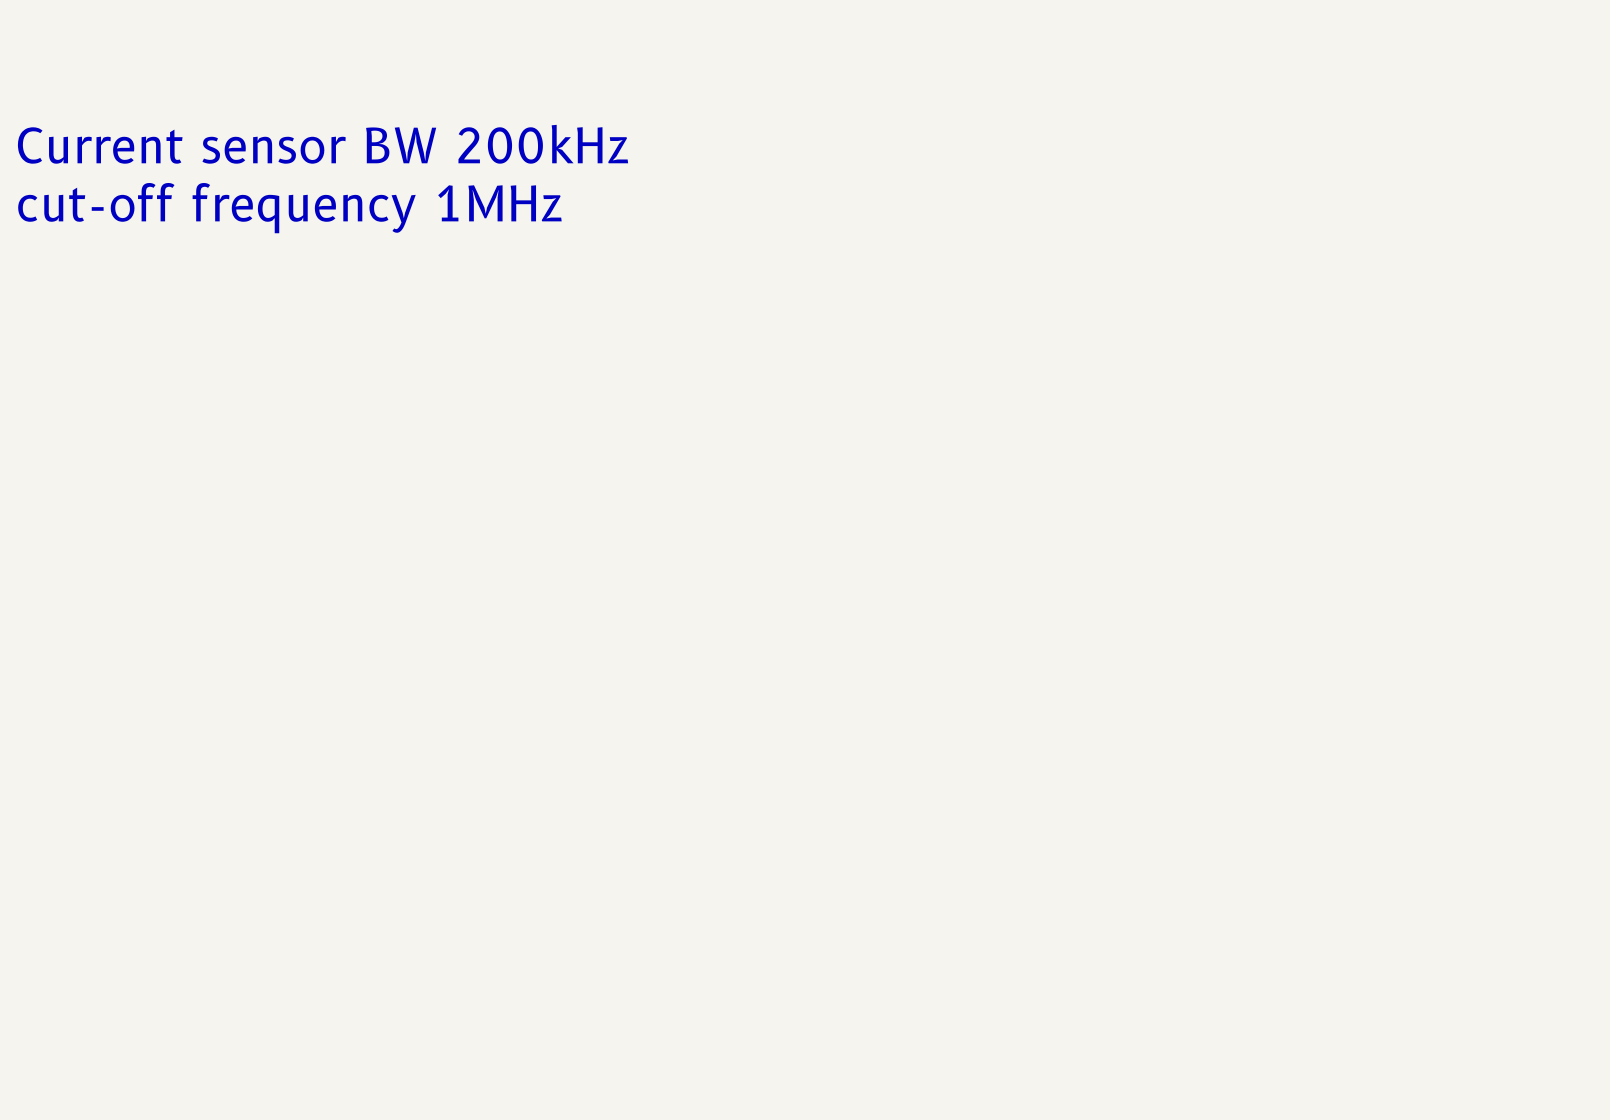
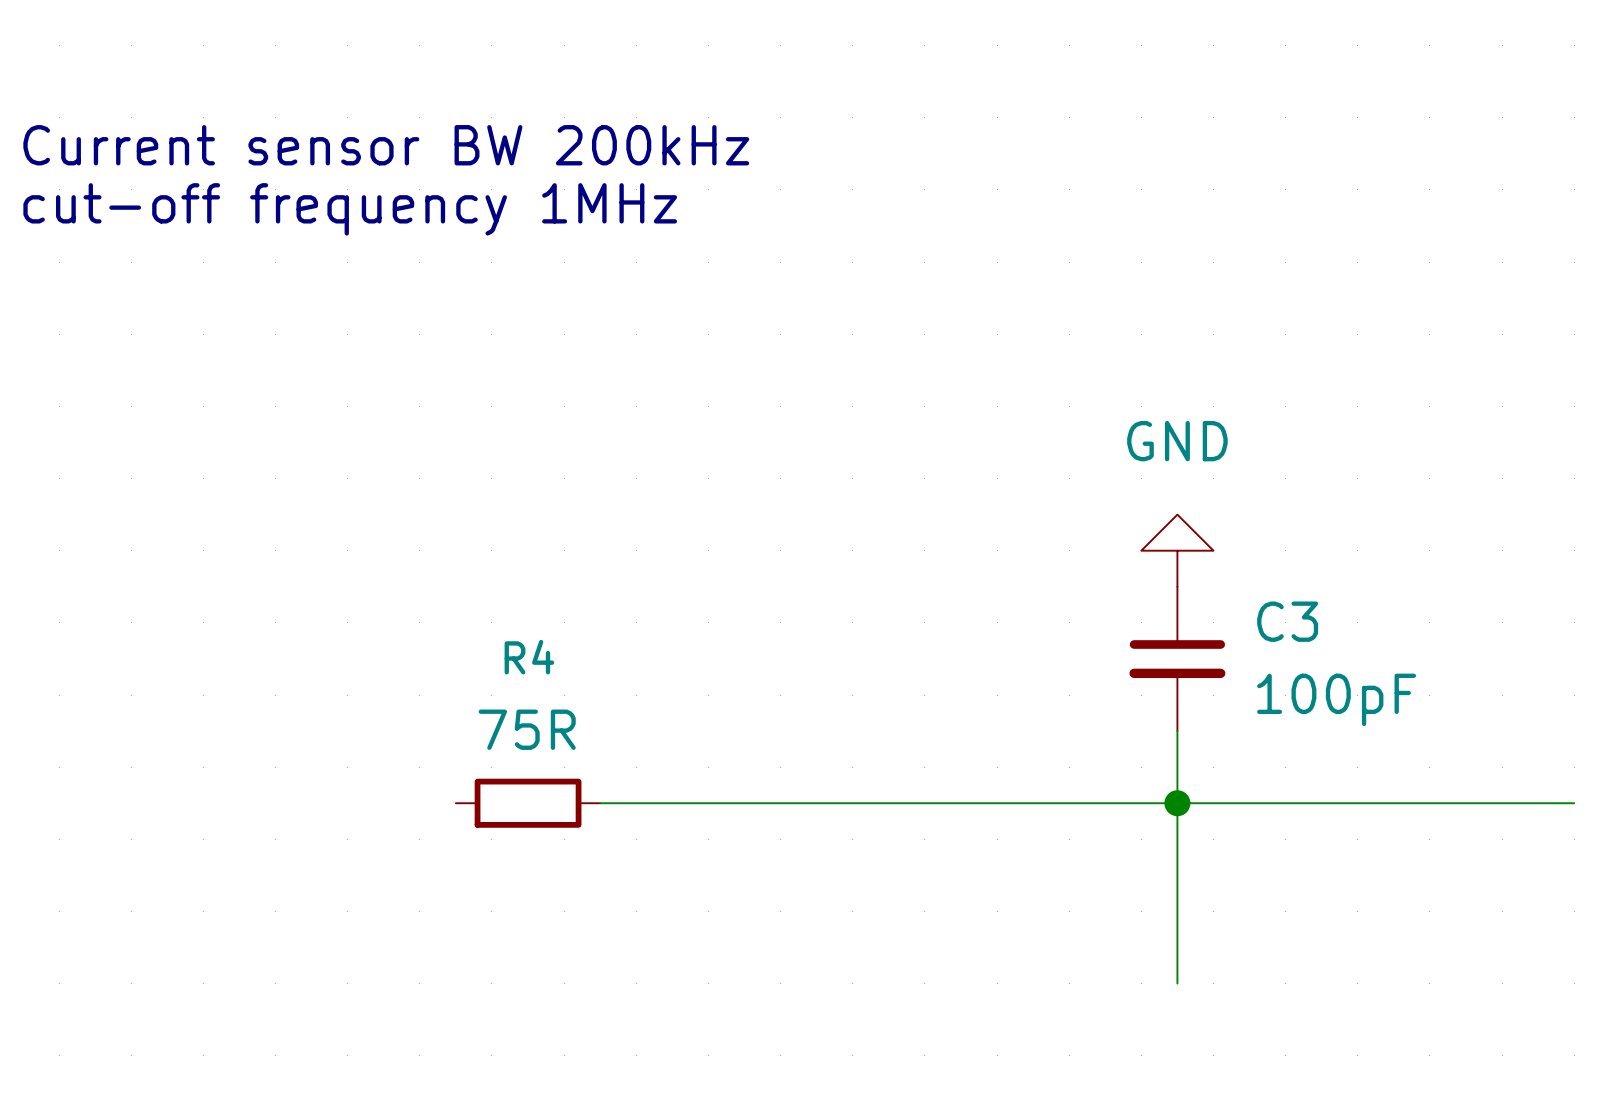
power symbol: none -> GND (1177, 550)
C3: none -> 100pF (1177, 658)
wire: none -> (1177, 731) (1177, 983)
R4: none -> 75R (528, 803)
wire: none -> (600, 803) (1574, 803)
junction: none -> (1177, 803)

